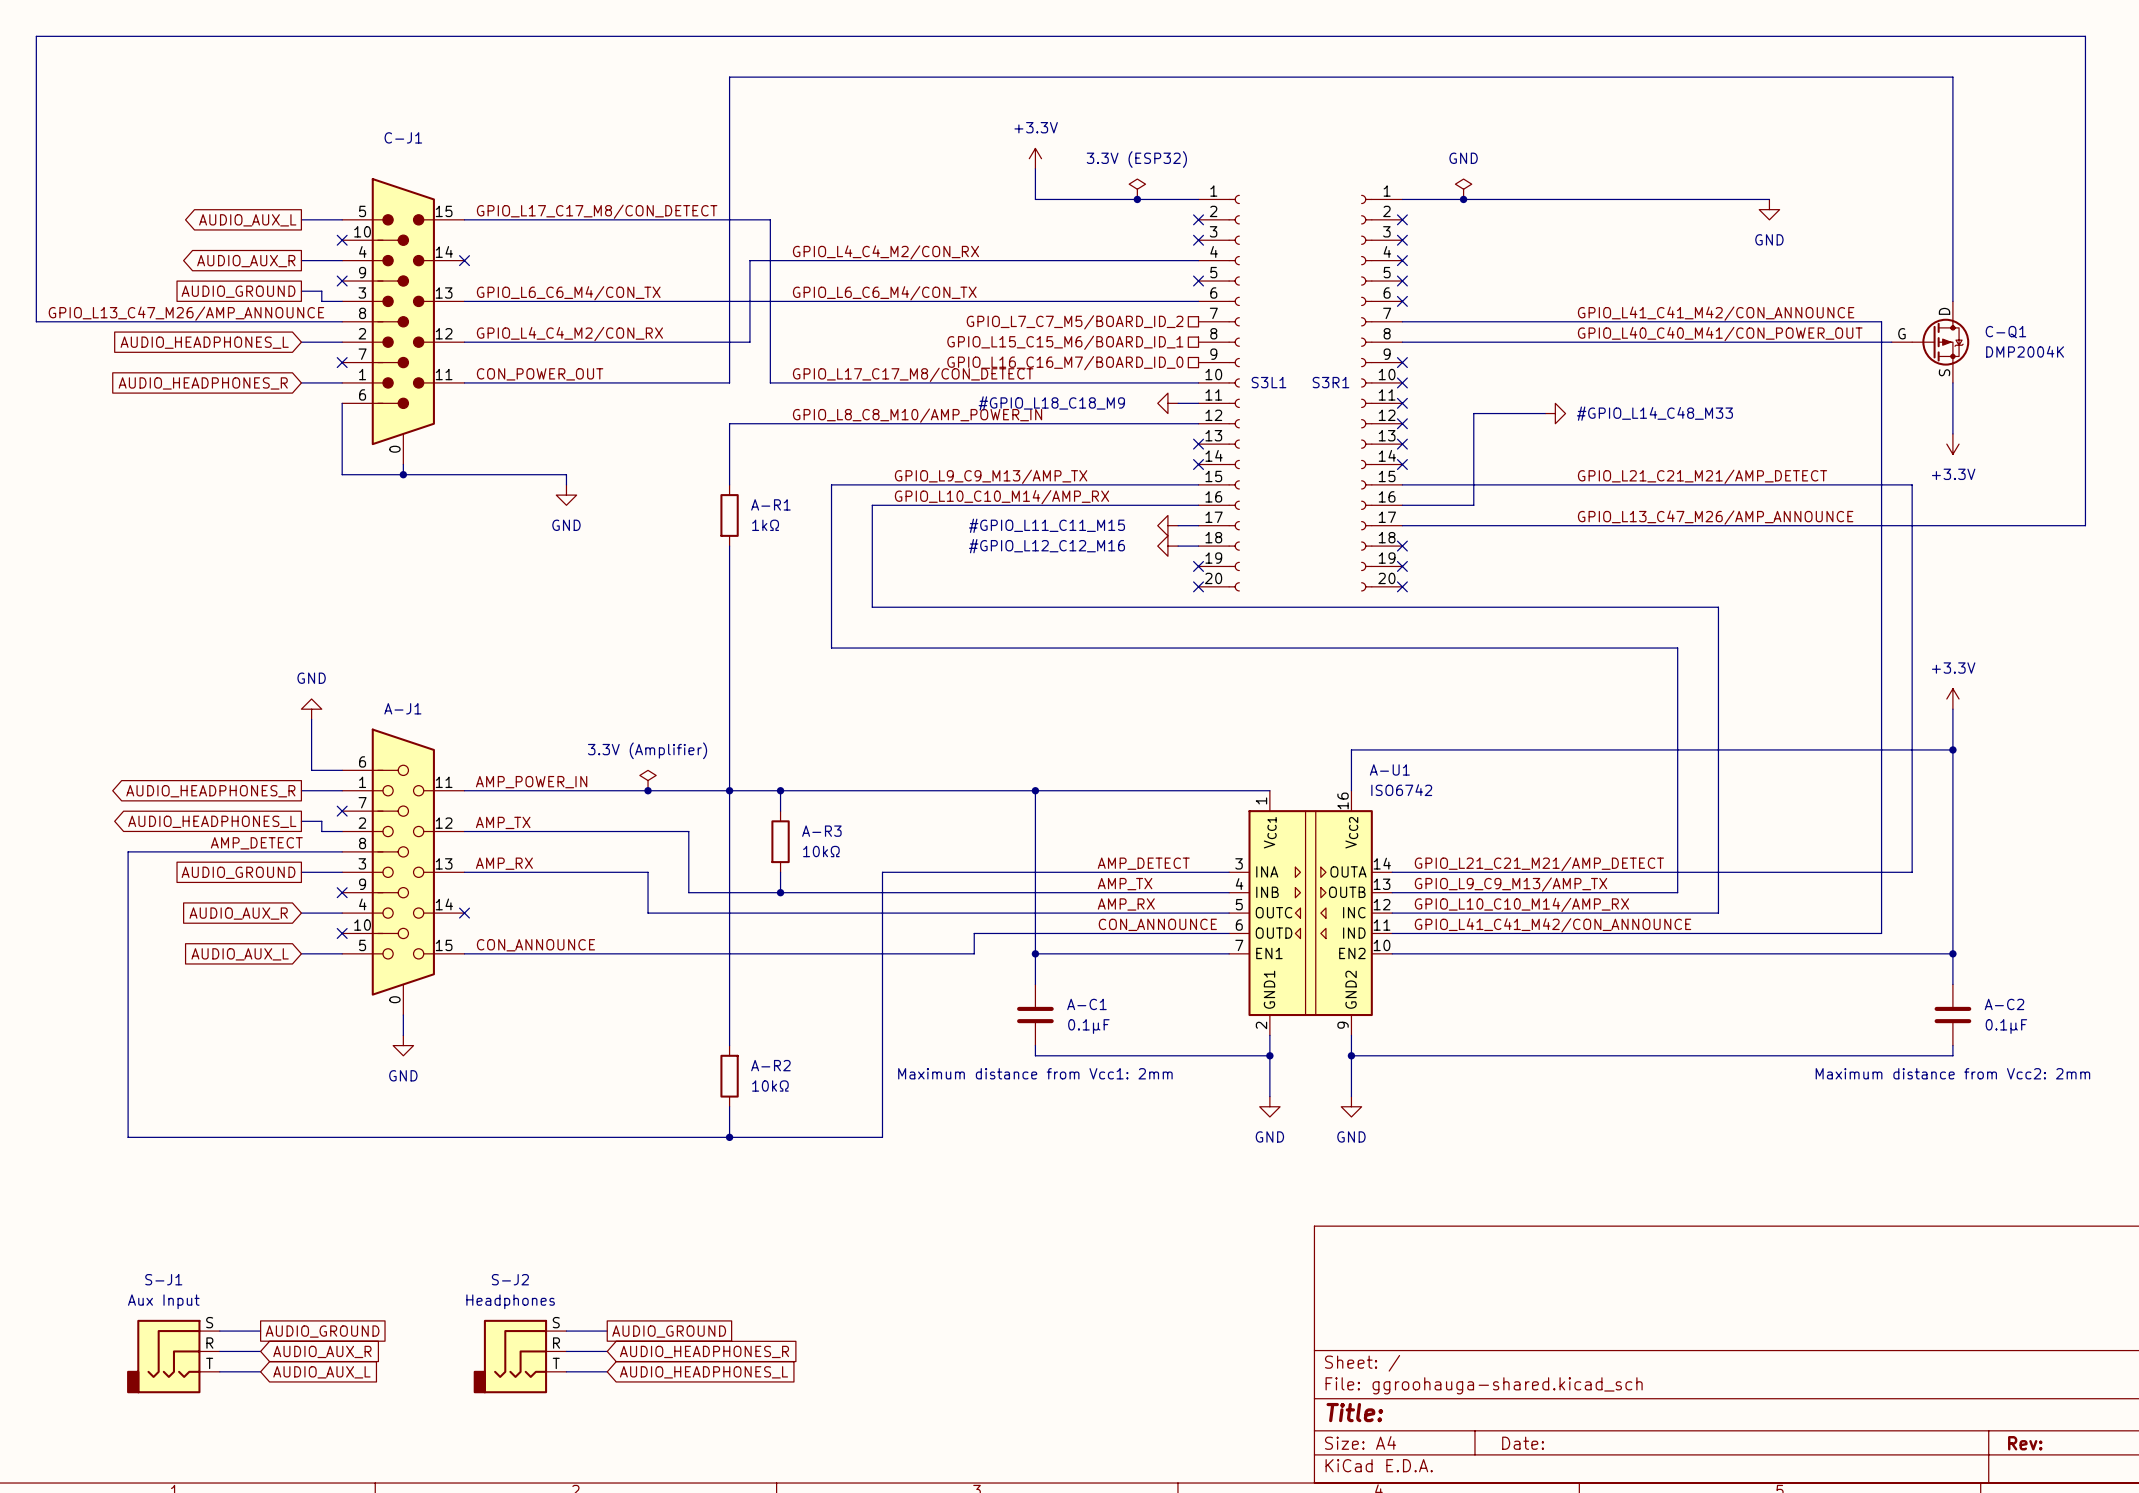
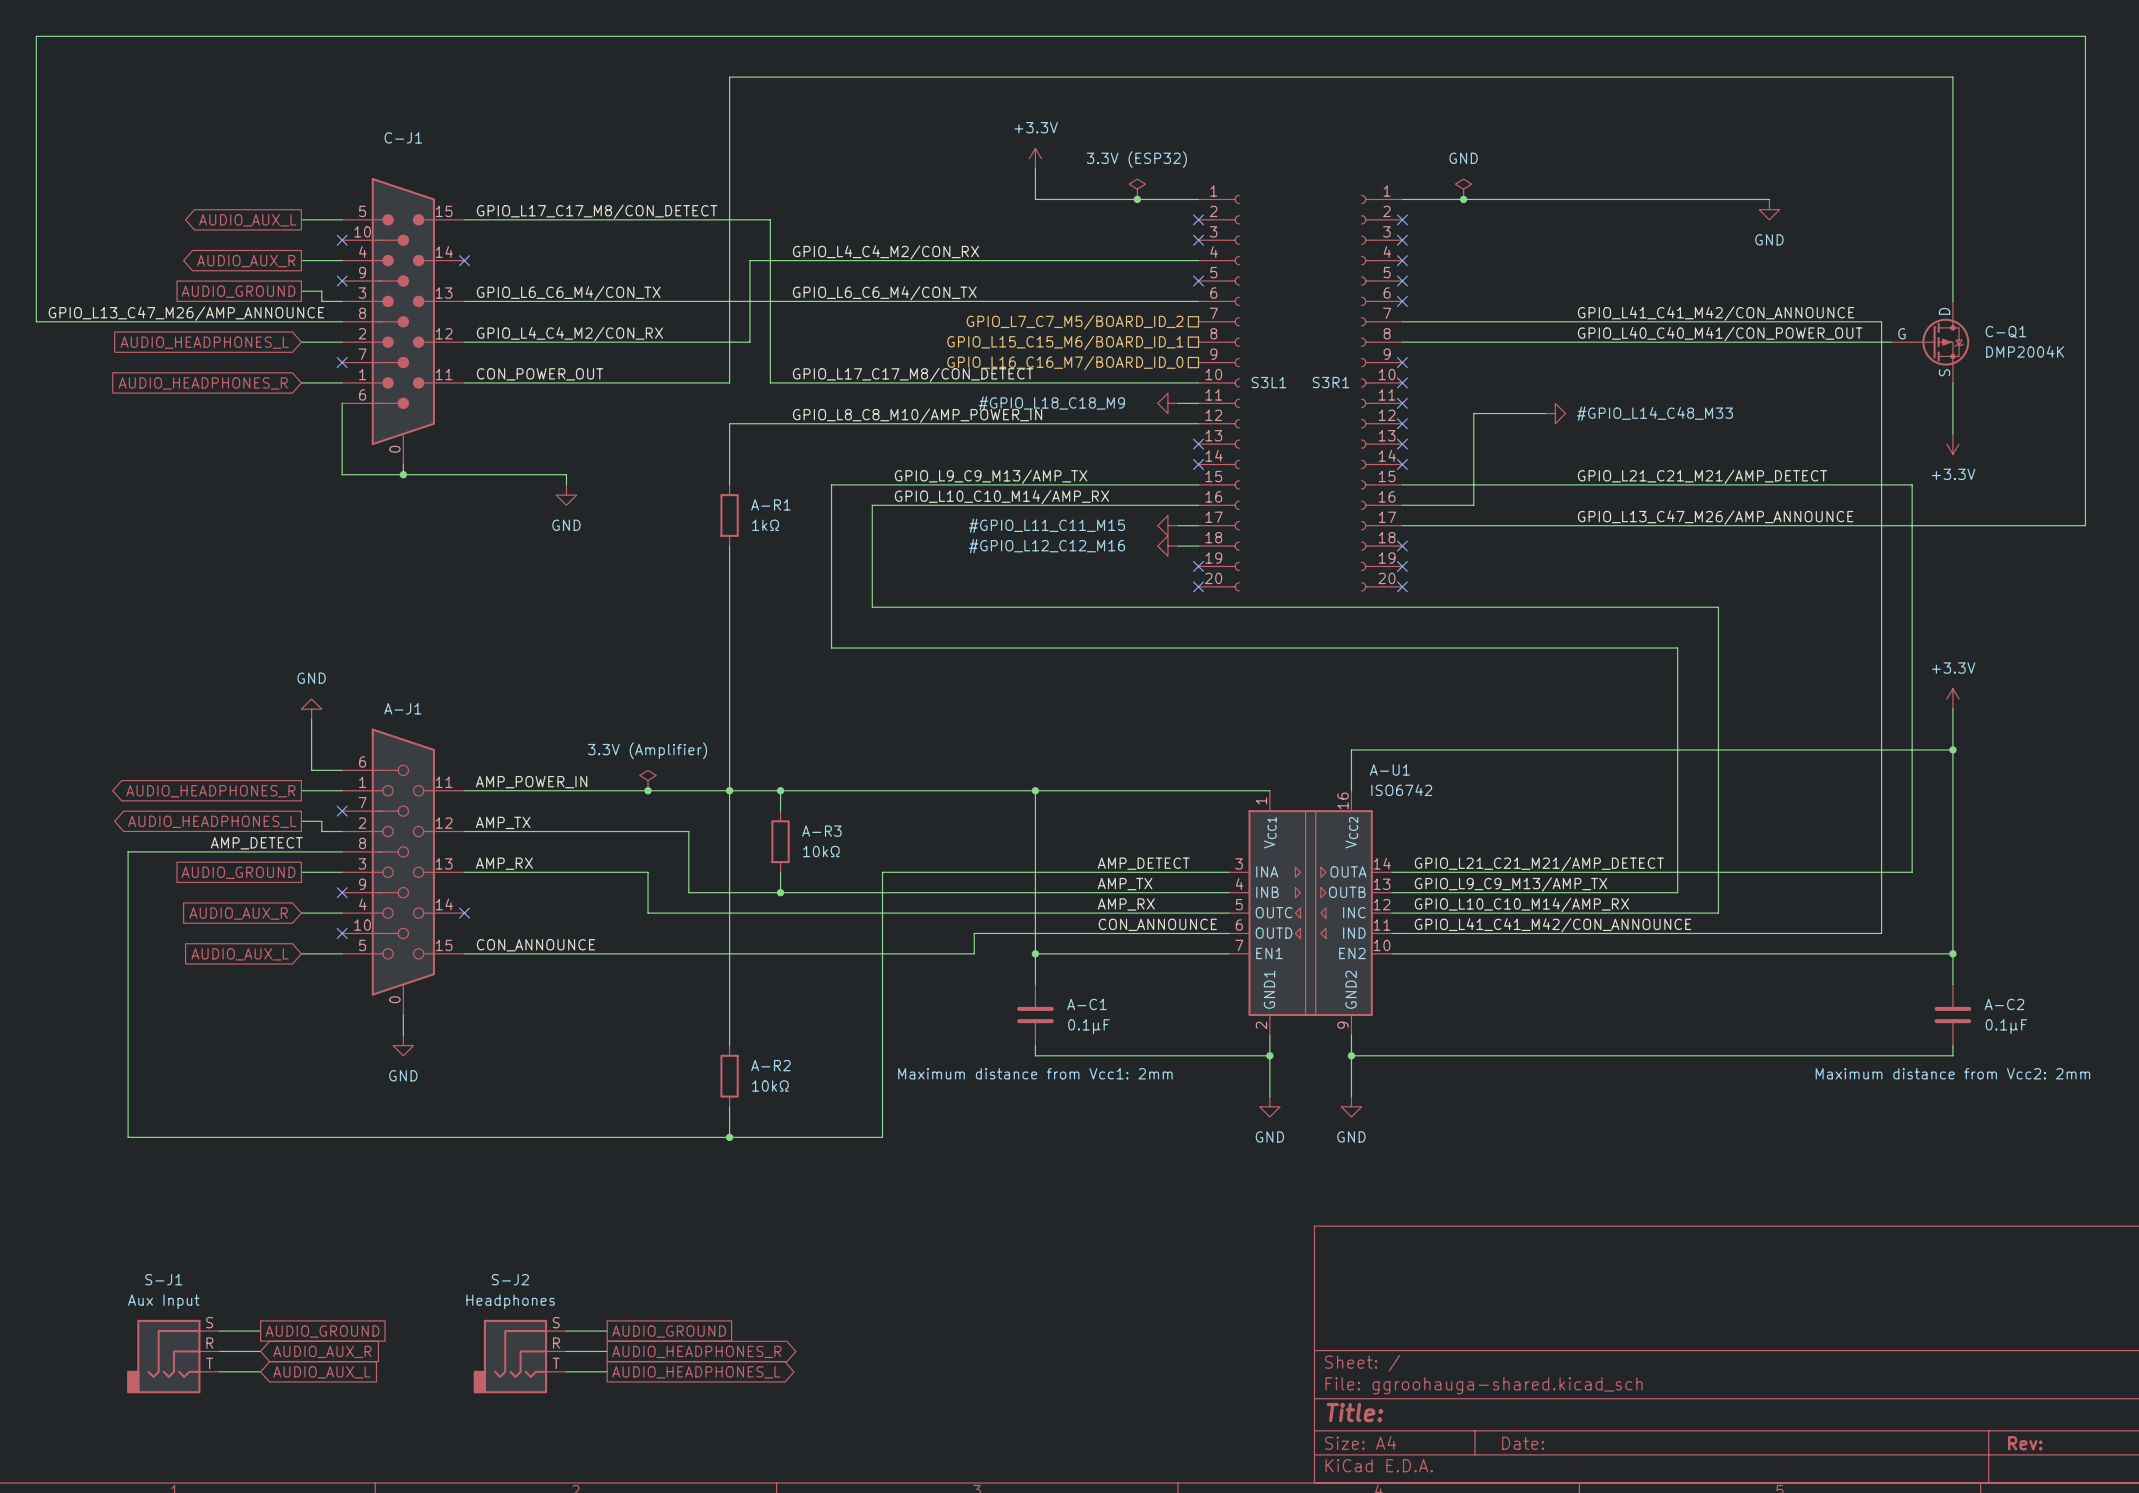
global label shape: input (704, 1351) -> output (696, 1351)
global label shape: input (703, 1372) -> output (696, 1372)

